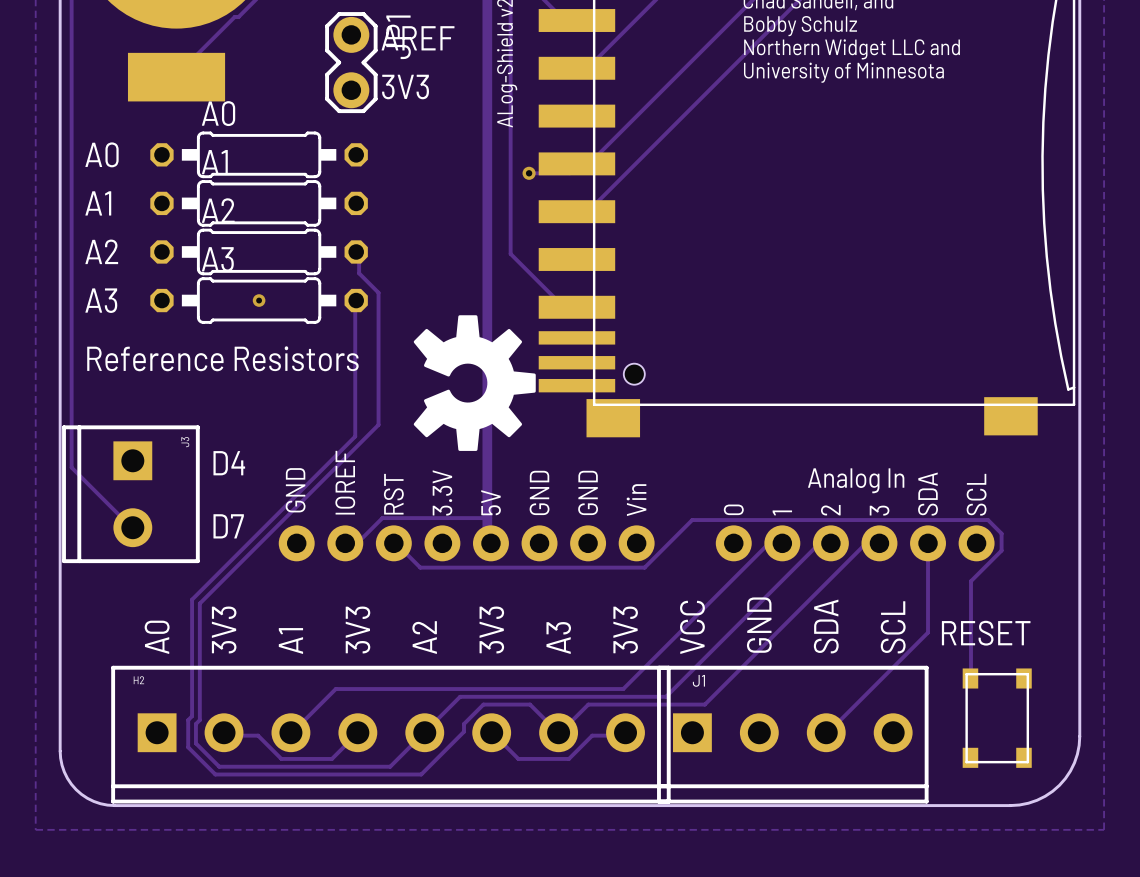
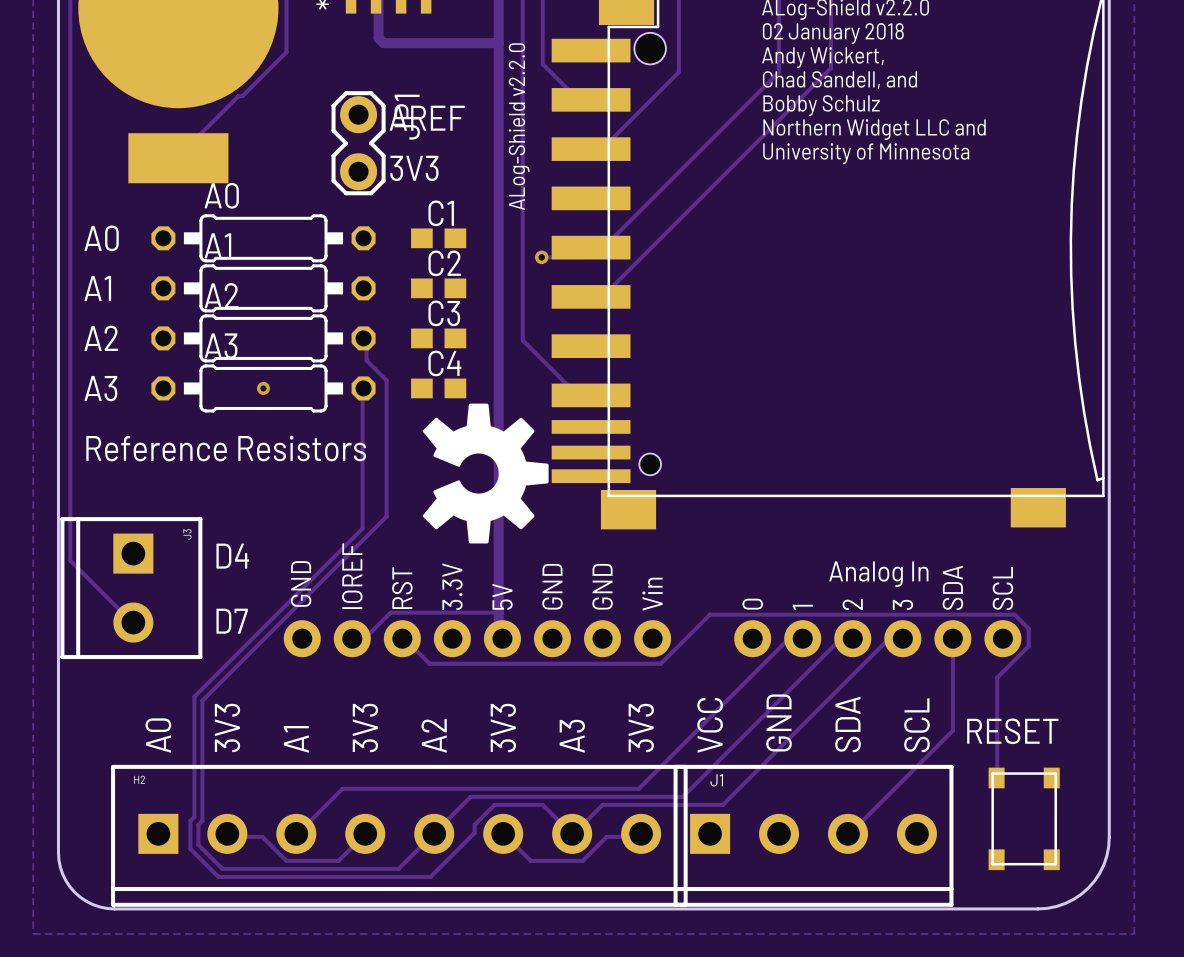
C1: none -> (438, 238)
C2: none -> (438, 288)
C3: none -> (438, 338)
C4: none -> (438, 388)

